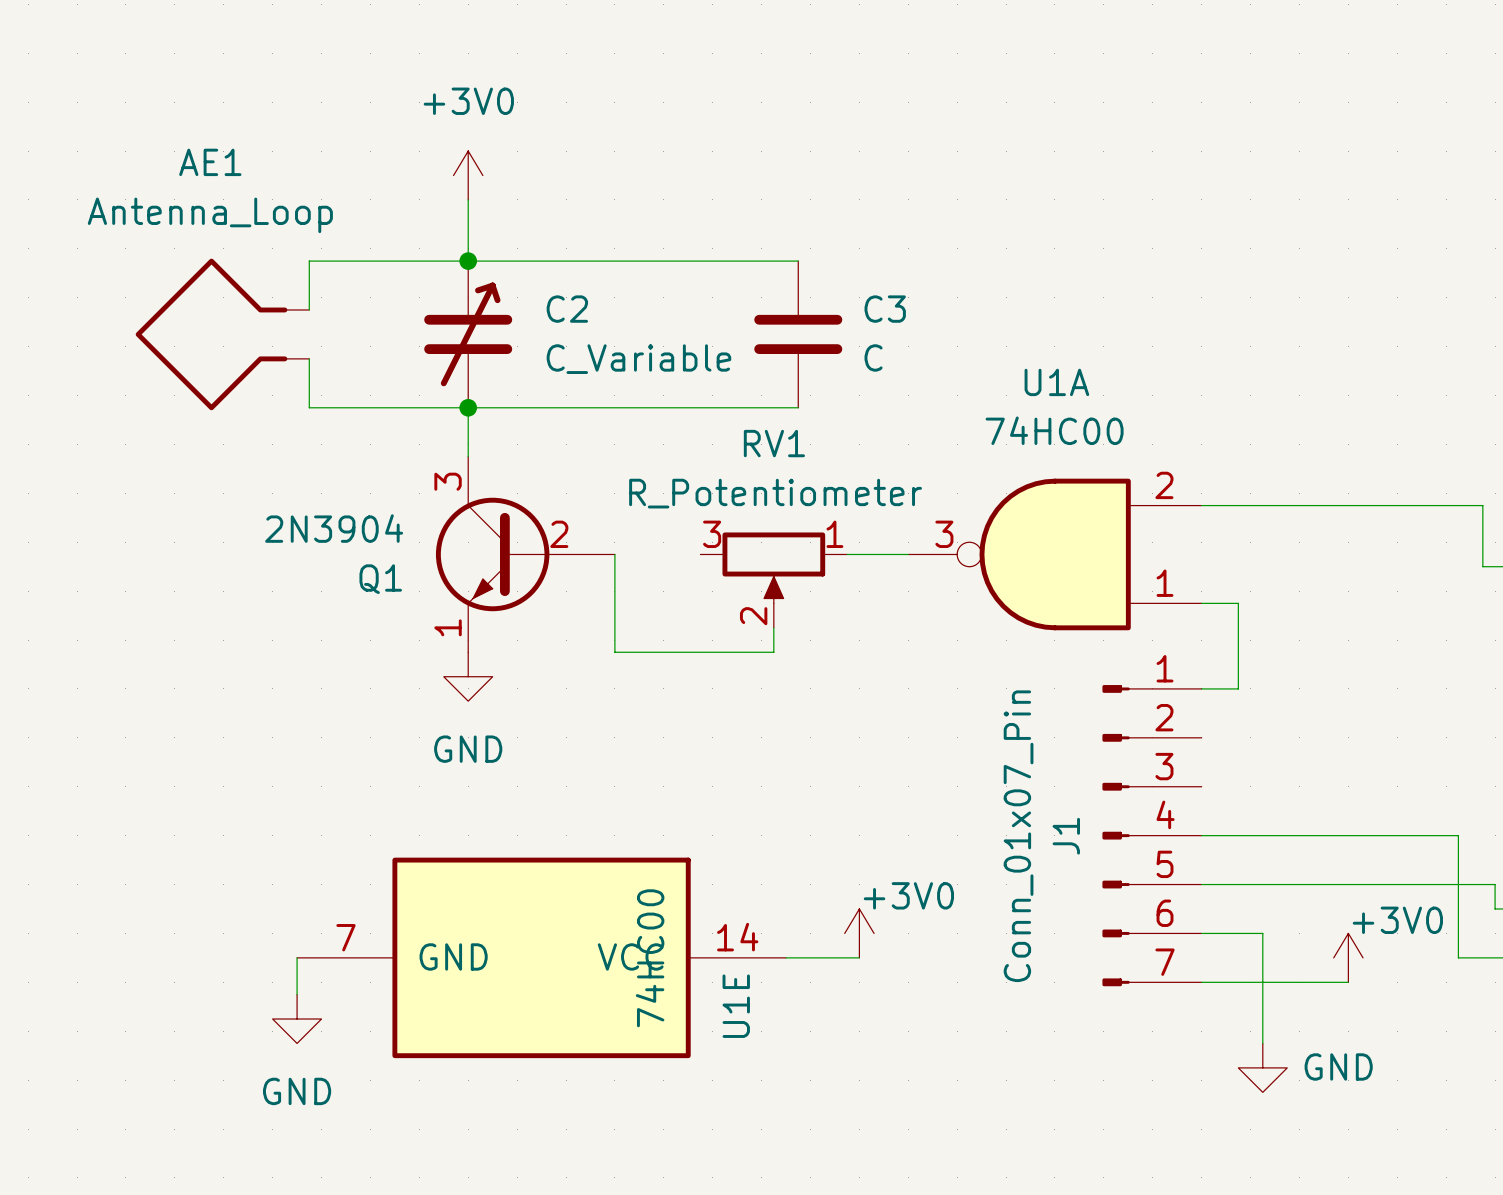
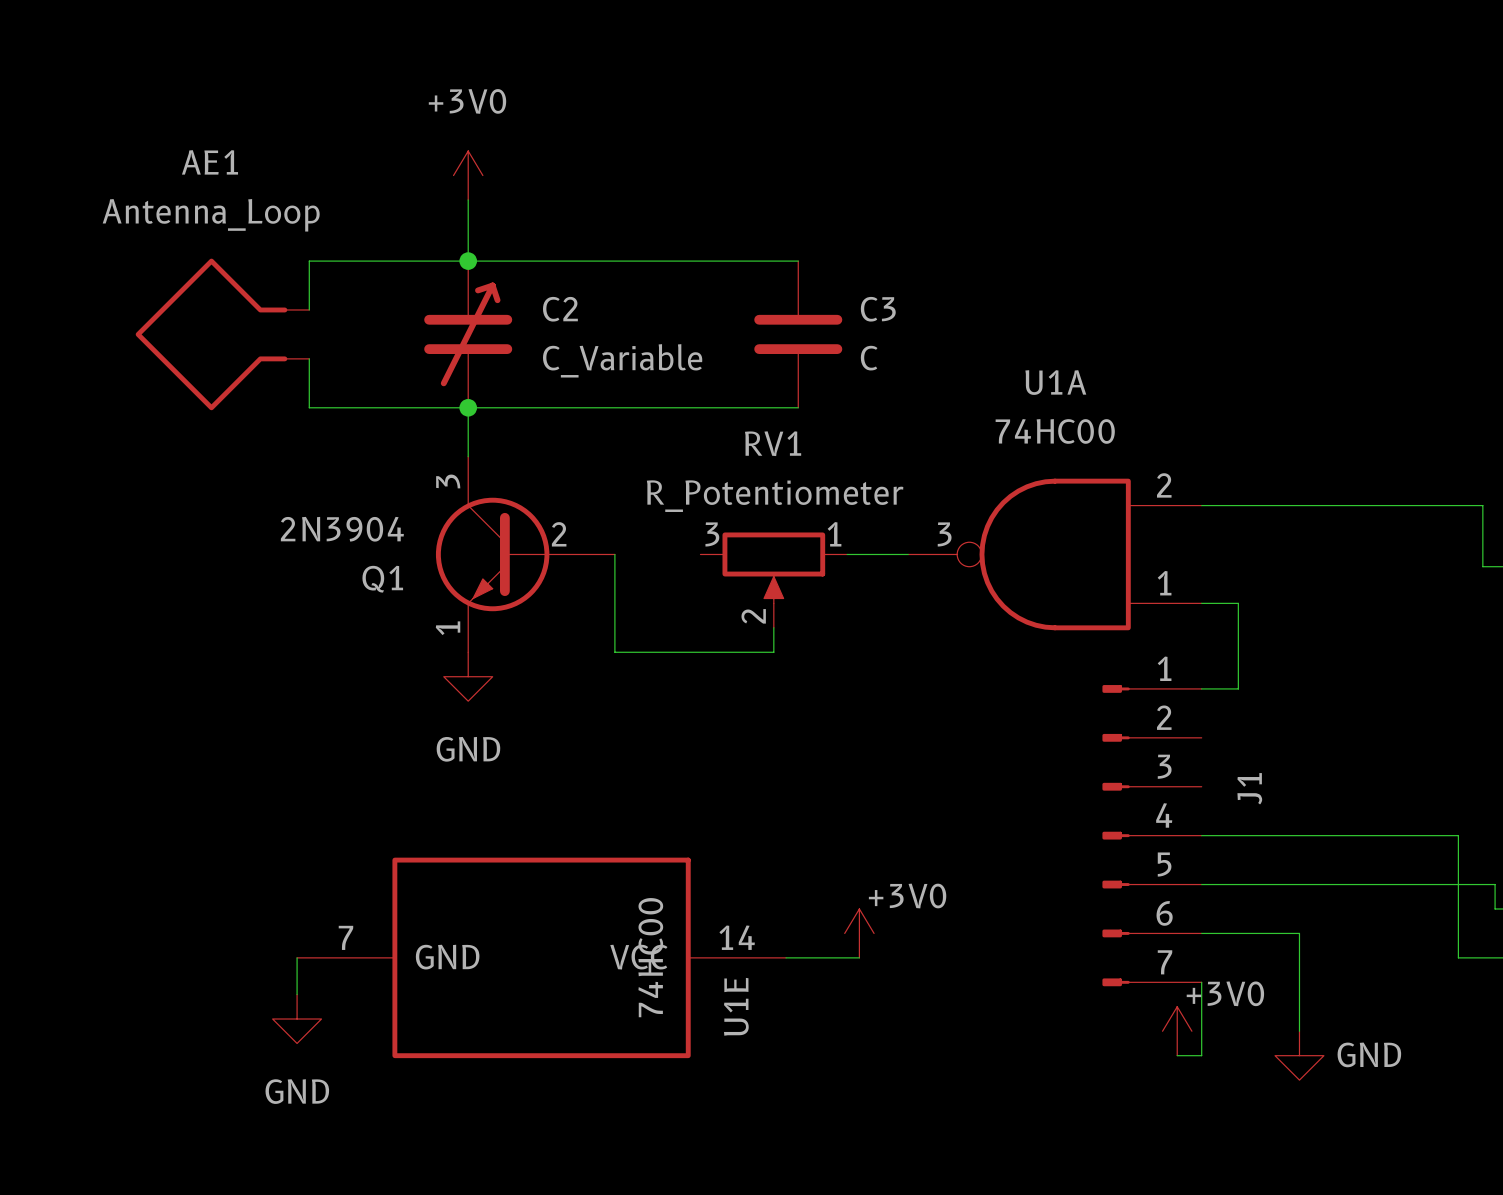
J1 value: Conn_01x07_Pin (1018, 836) -> none
J1 name position: J1 (1066, 836) -> J1 (1249, 788)
wire: (1262, 933) (1262, 1043) -> (1262, 933) (1299, 933) (1299, 1031)
power symbol position: +3V0 (1348, 957) -> +3V0 (1177, 1031)
wire: (1201, 982) (1348, 982) -> (1201, 982) (1201, 1055) (1177, 1055)
power symbol position: GND (1262, 1067) -> GND (1299, 1055)

